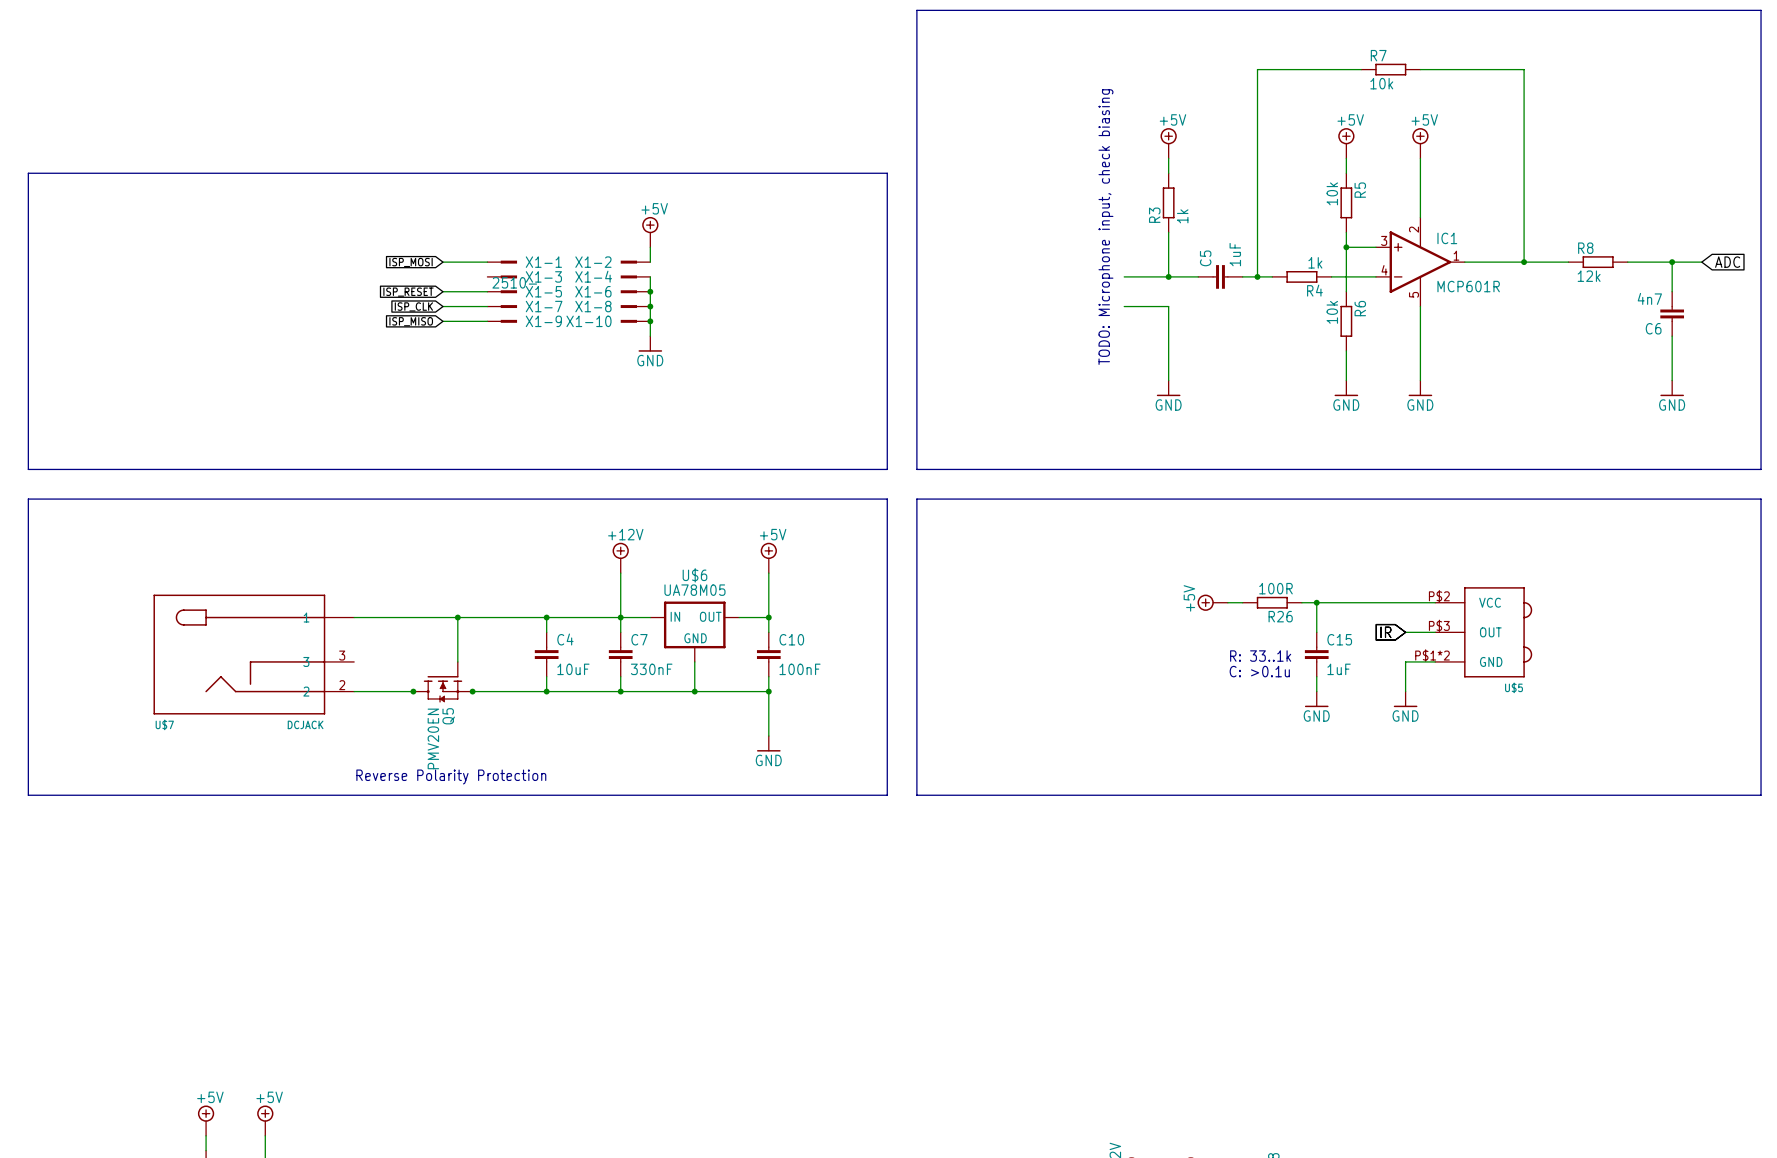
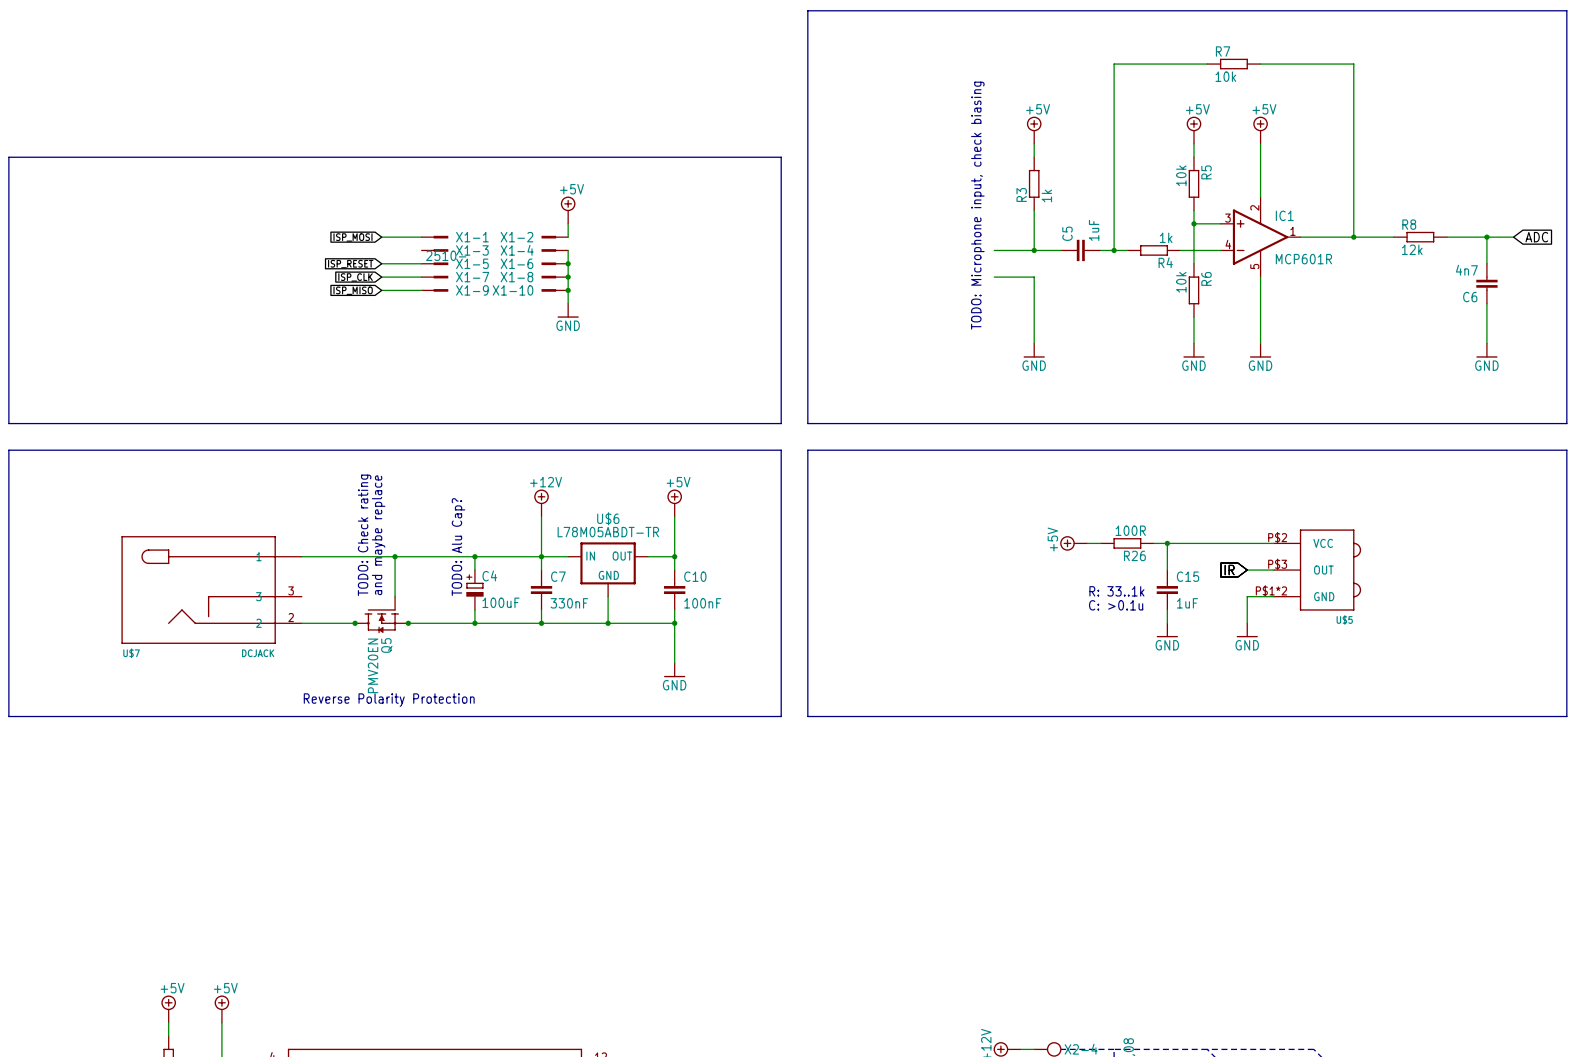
U$6 value: UA78M05 (694, 590) -> L78M05ABDT-TR (608, 532)
text: none -> TODO: Check rating (364, 535)
text: none -> and maybe replace (378, 535)
text: none -> TODO: Alu Cap? (458, 547)
C4 symbol: [534, 632, 559, 677] -> [466, 570, 484, 610]
C4 value: 10uF (573, 669) -> 100uF (501, 602)

